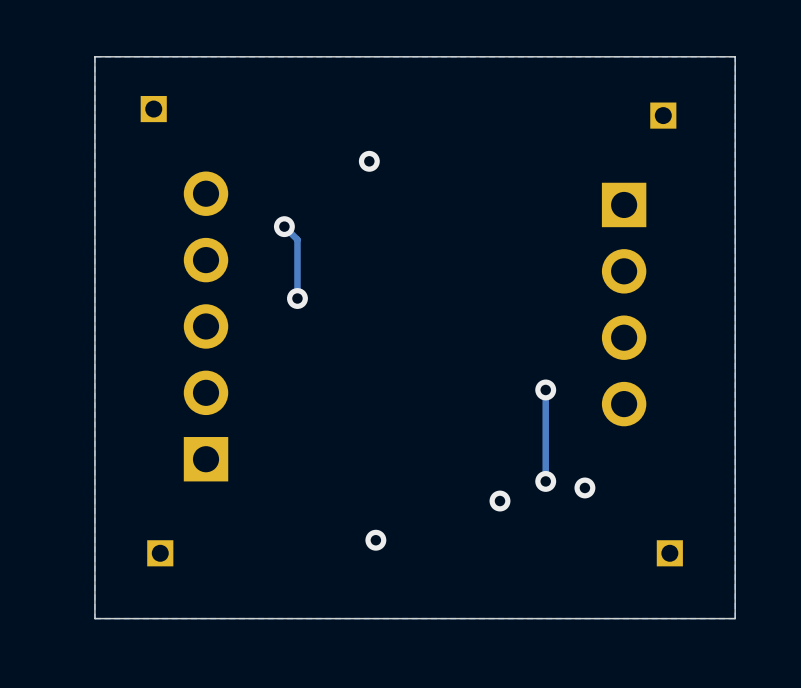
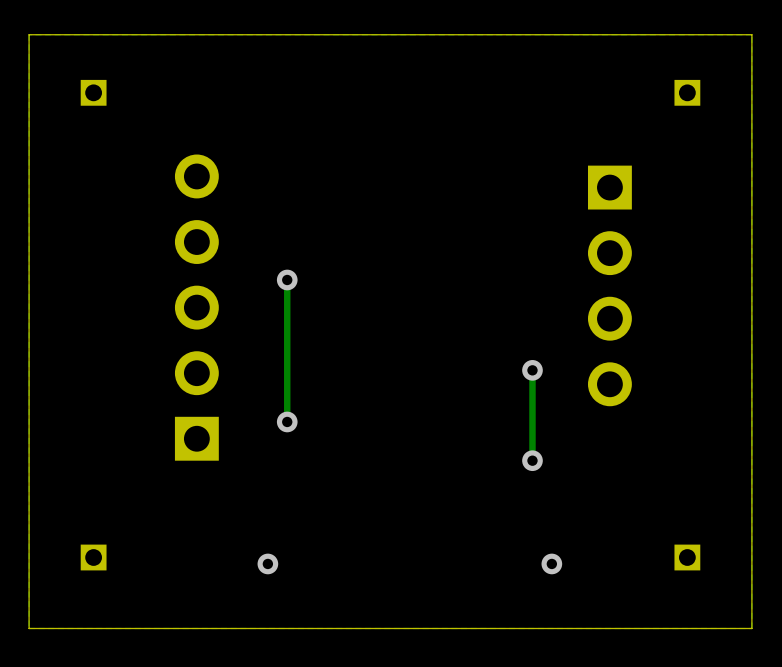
board edge: (735, 56) (94, 56) (94, 618) (735, 618) (735, 56) -> (751, 34) (751, 628) (29, 628) (29, 34) (751, 34)
part position: (153, 109) -> (93, 92)
part position: (663, 115) -> (687, 92)
via: (369, 161) -> none
track: (284, 226) (297, 239) (297, 298) -> (287, 421) (287, 279)
via: (284, 226) -> none
via: none -> (287, 421)
via: (584, 487) -> none
via: (499, 501) -> none
via: (375, 540) -> none
part position: (160, 553) -> (93, 557)
part position: (669, 553) -> (687, 557)
via: none -> (267, 563)
via: none -> (551, 563)

